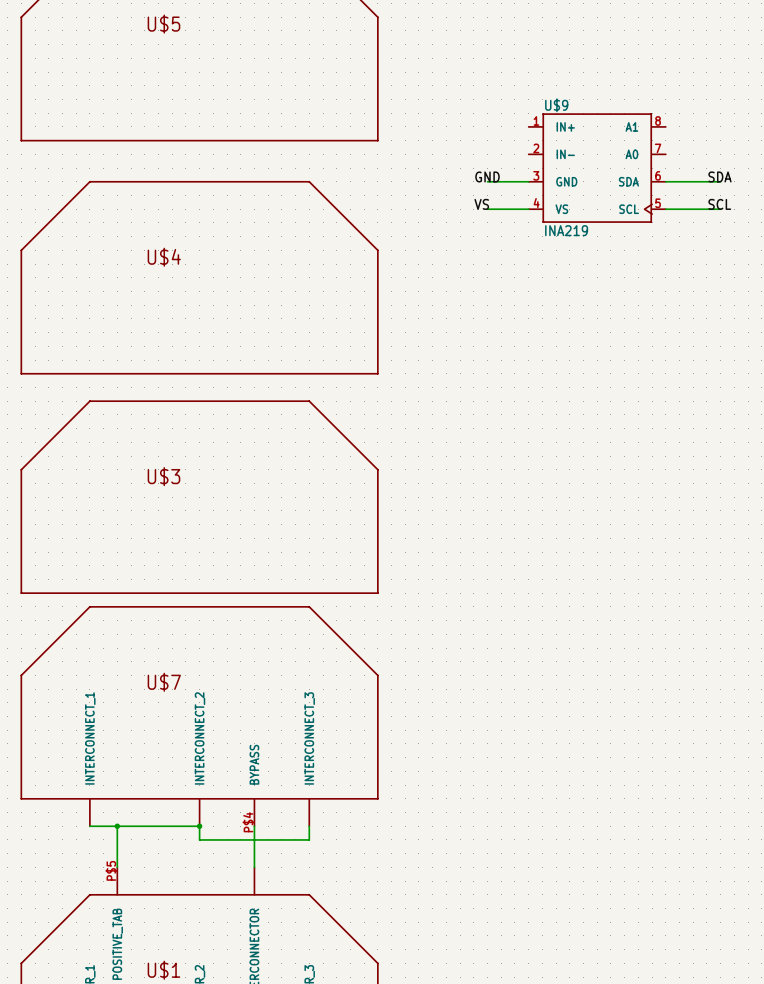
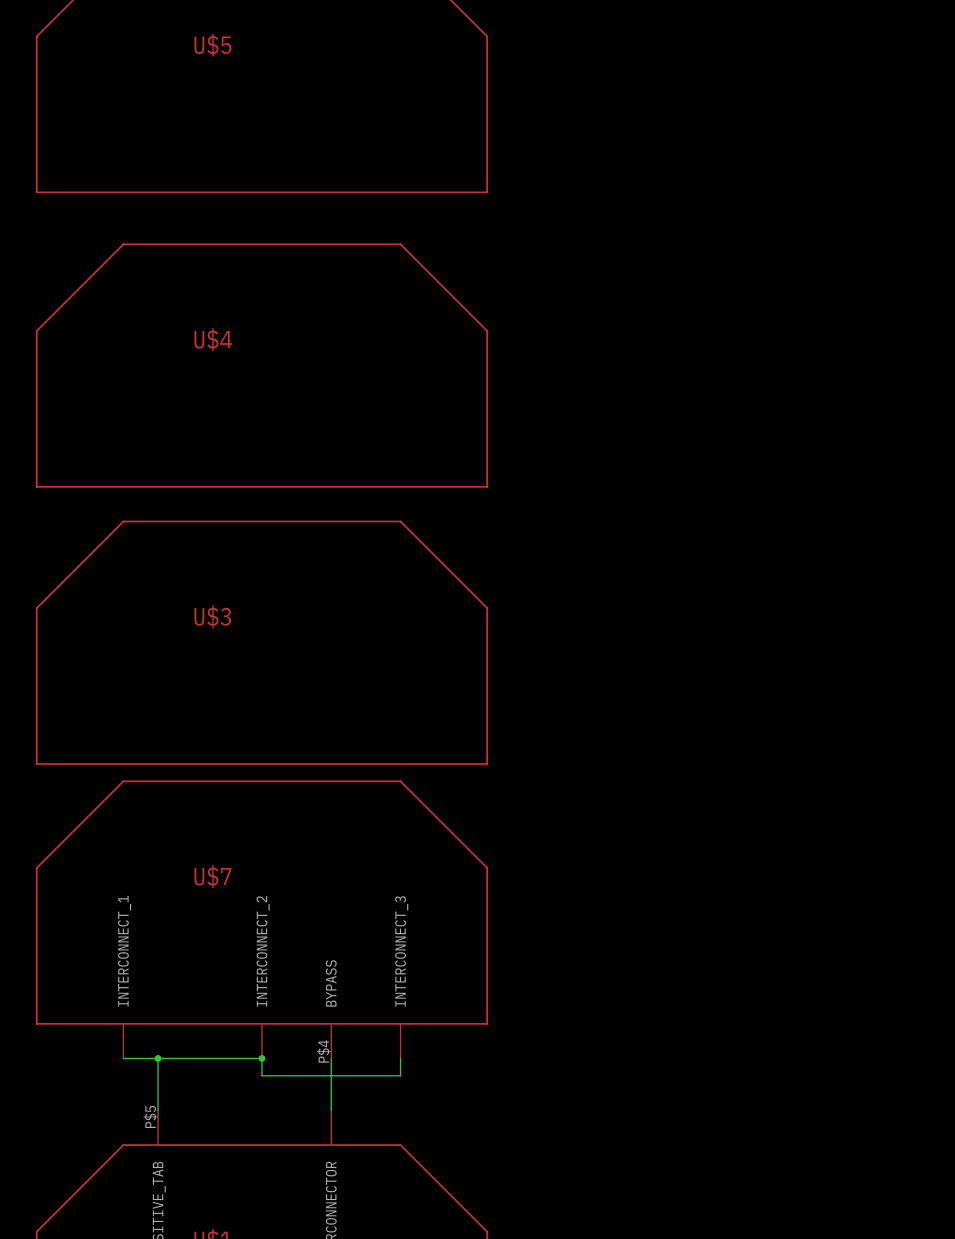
U$9: INA219 (597, 168) -> none
label: GND (487, 176) -> none
label: SDA (719, 176) -> none
wire: (487, 181) (528, 181) -> none
wire: (665, 181) (720, 181) -> none
label: VS (481, 204) -> none
label: SCL (719, 204) -> none
wire: (487, 209) (528, 209) -> none
wire: (665, 209) (720, 209) -> none

